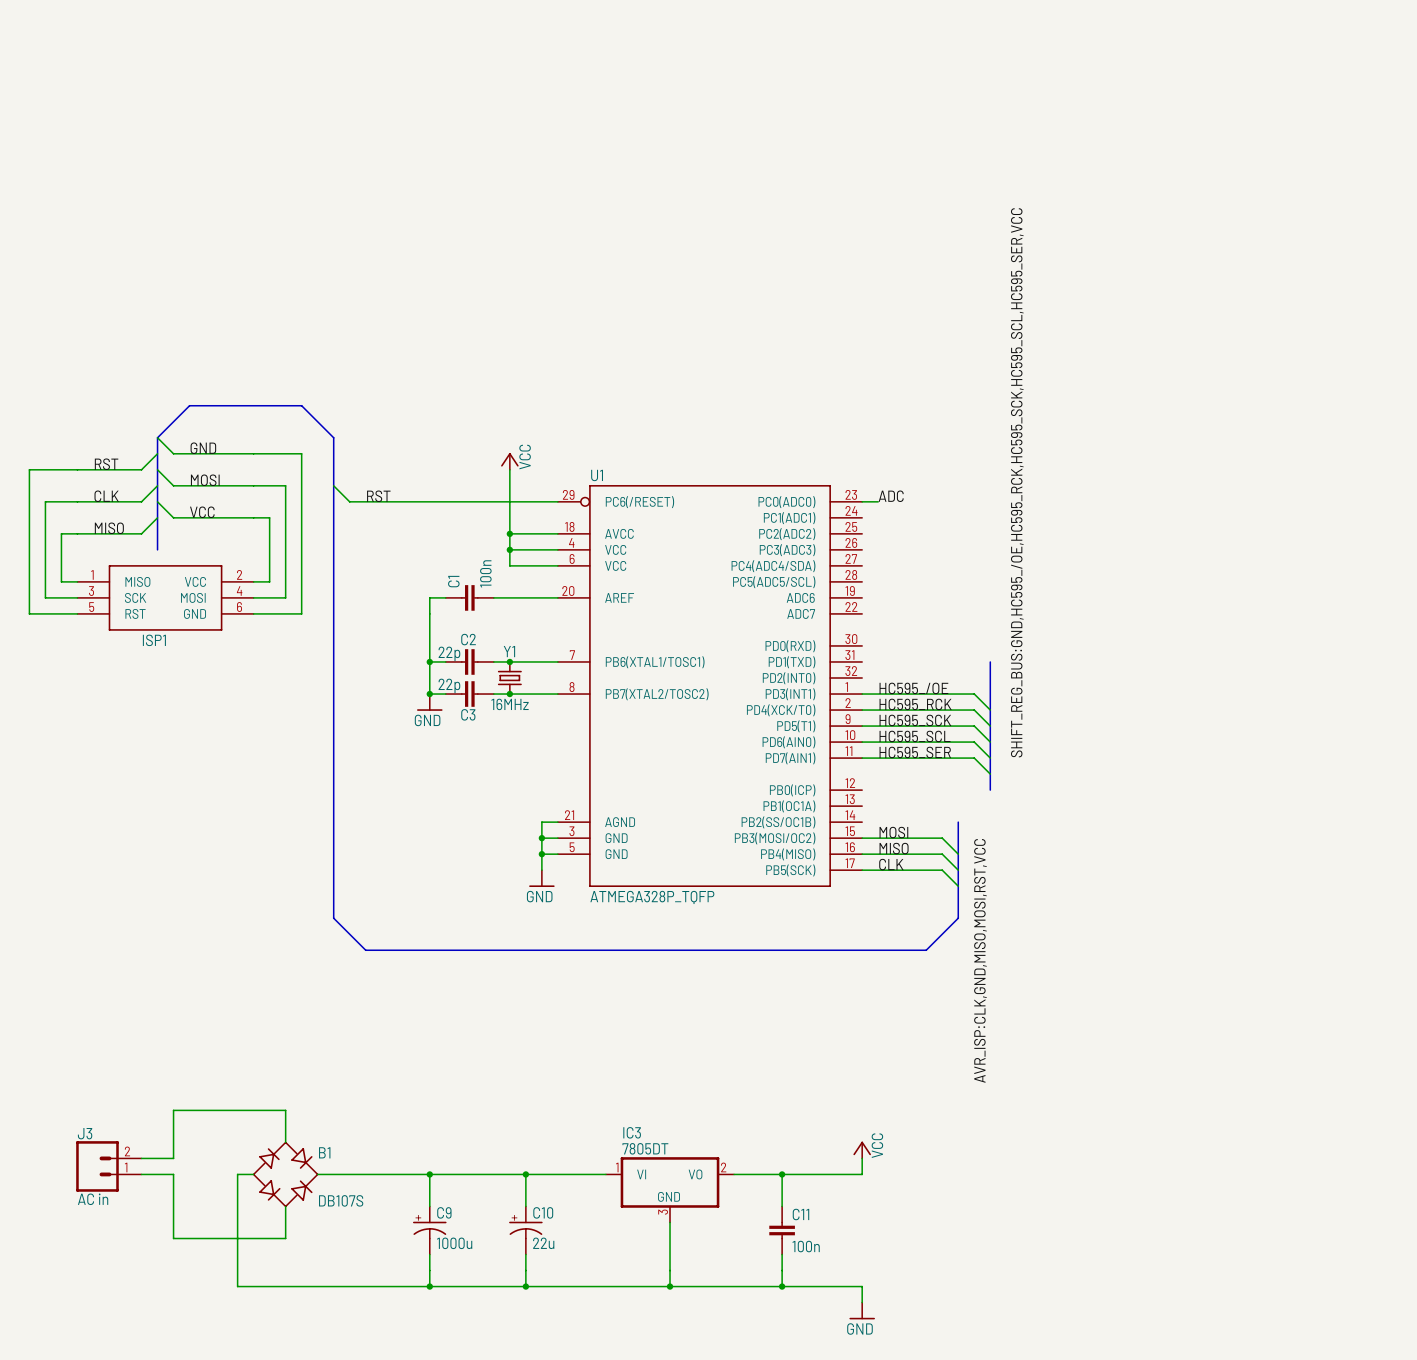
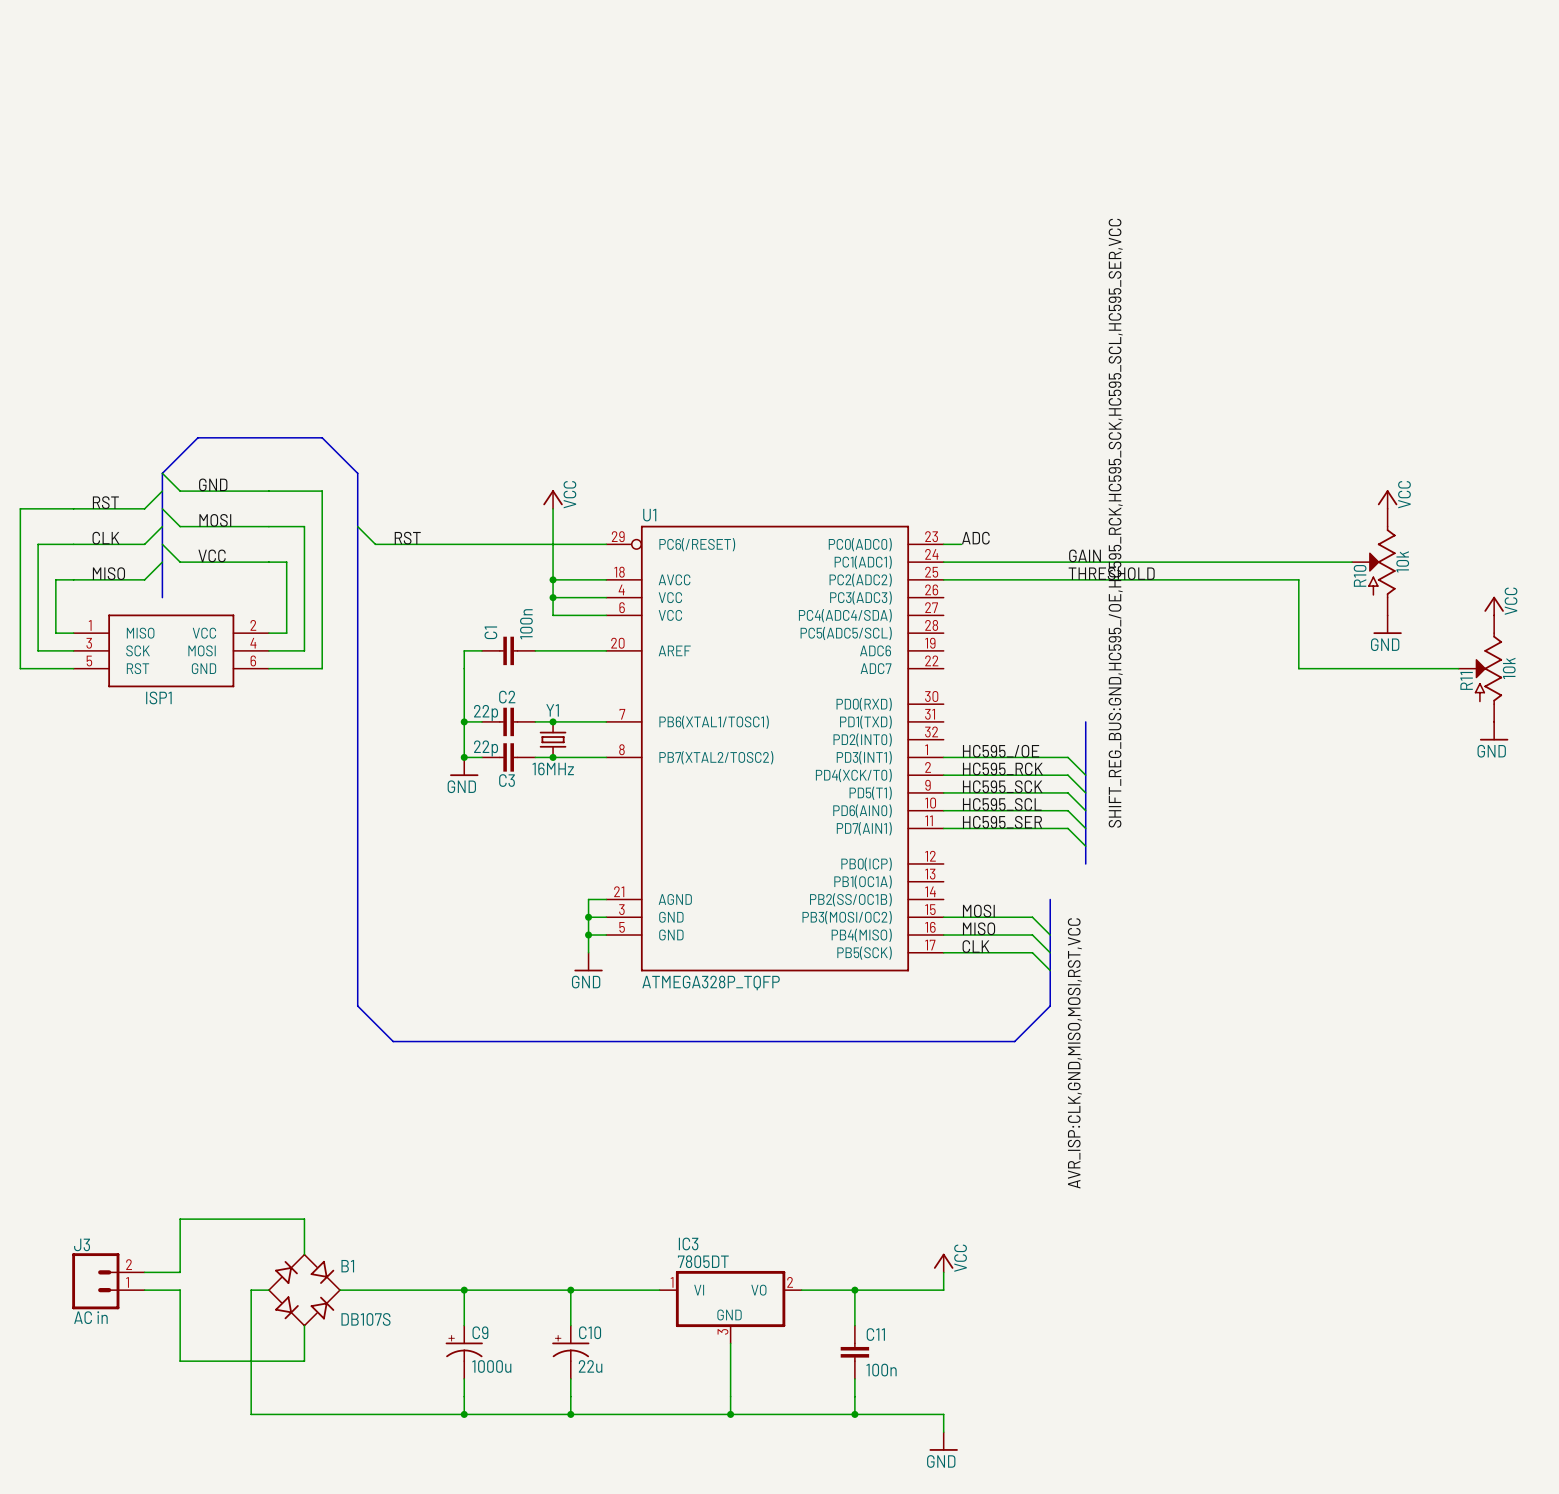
power symbol: none -> VCC (1387, 499)
label: none -> GAIN (1085, 555)
wire: none -> (943, 562) (1352, 562)
R10: none -> 10k (1373, 562)
label: none -> THRESHOLD (1111, 573)
wire: none -> (943, 579) (1298, 579) (1298, 668) (1458, 668)
power symbol: none -> VCC (1494, 606)
power symbol: none -> GND (1387, 624)
R11: none -> 10k (1480, 668)
power symbol: none -> GND (1494, 731)

